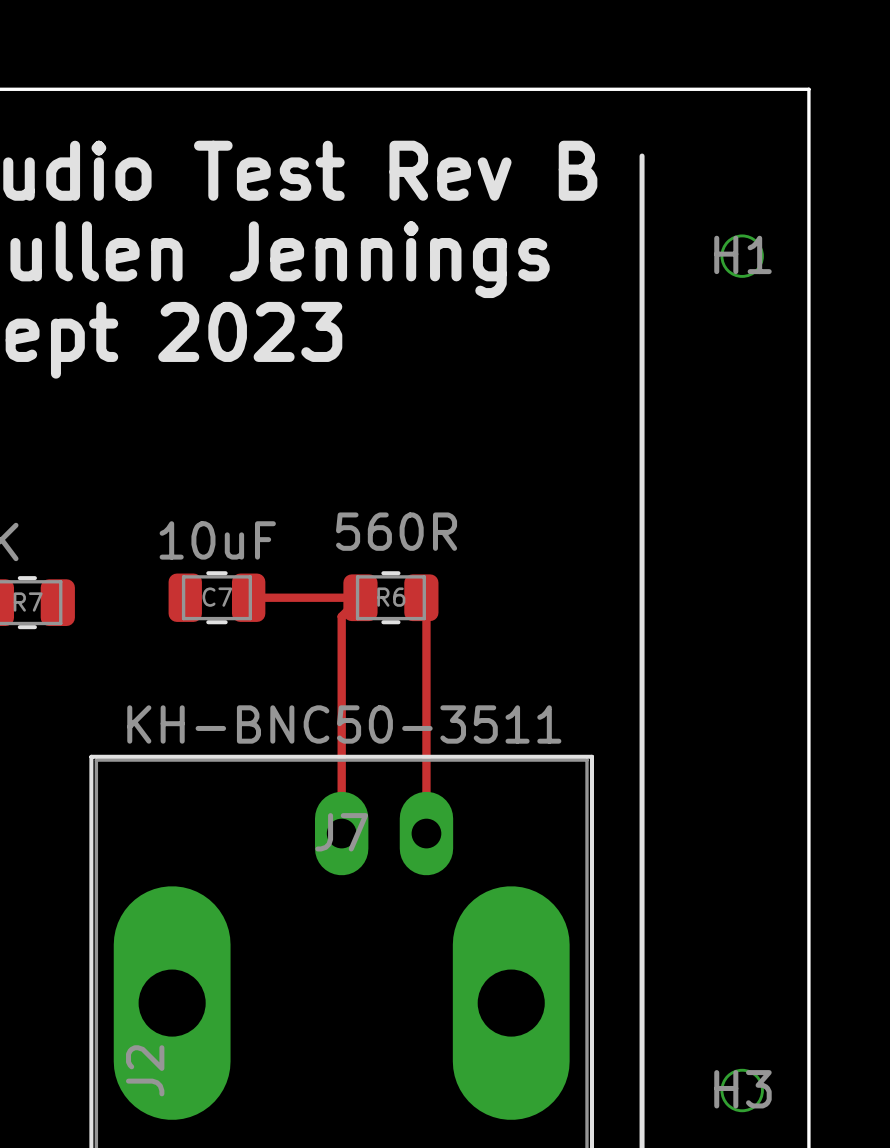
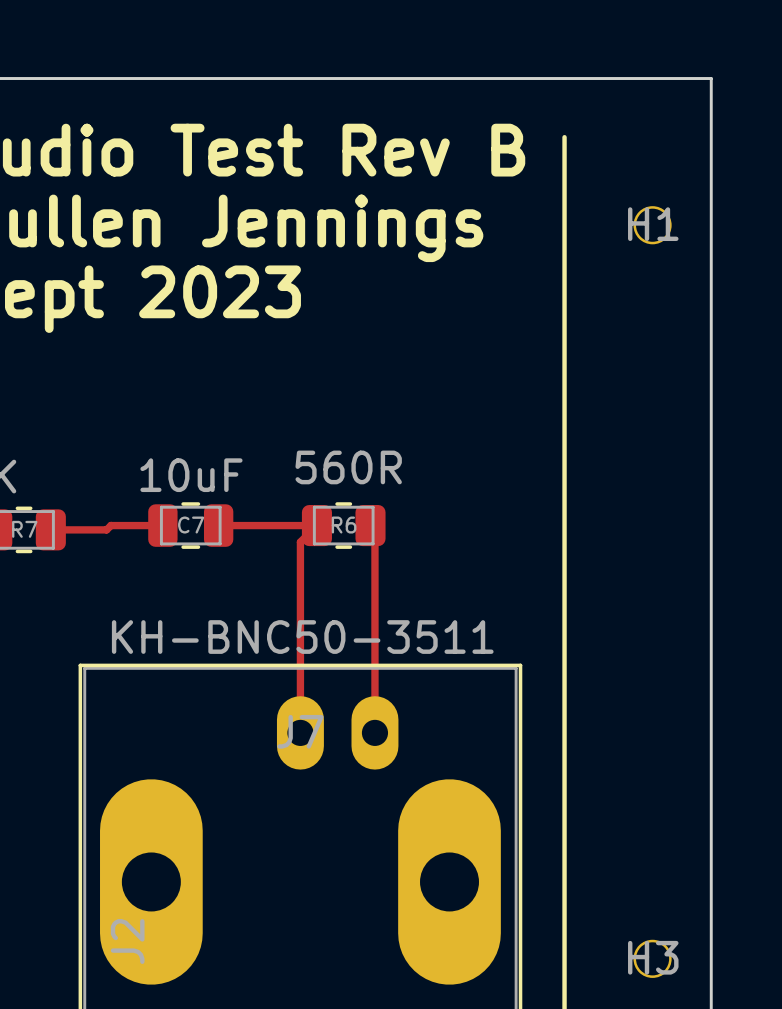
track: none -> (162, 525) (111, 525) (106, 529) (50, 529)

